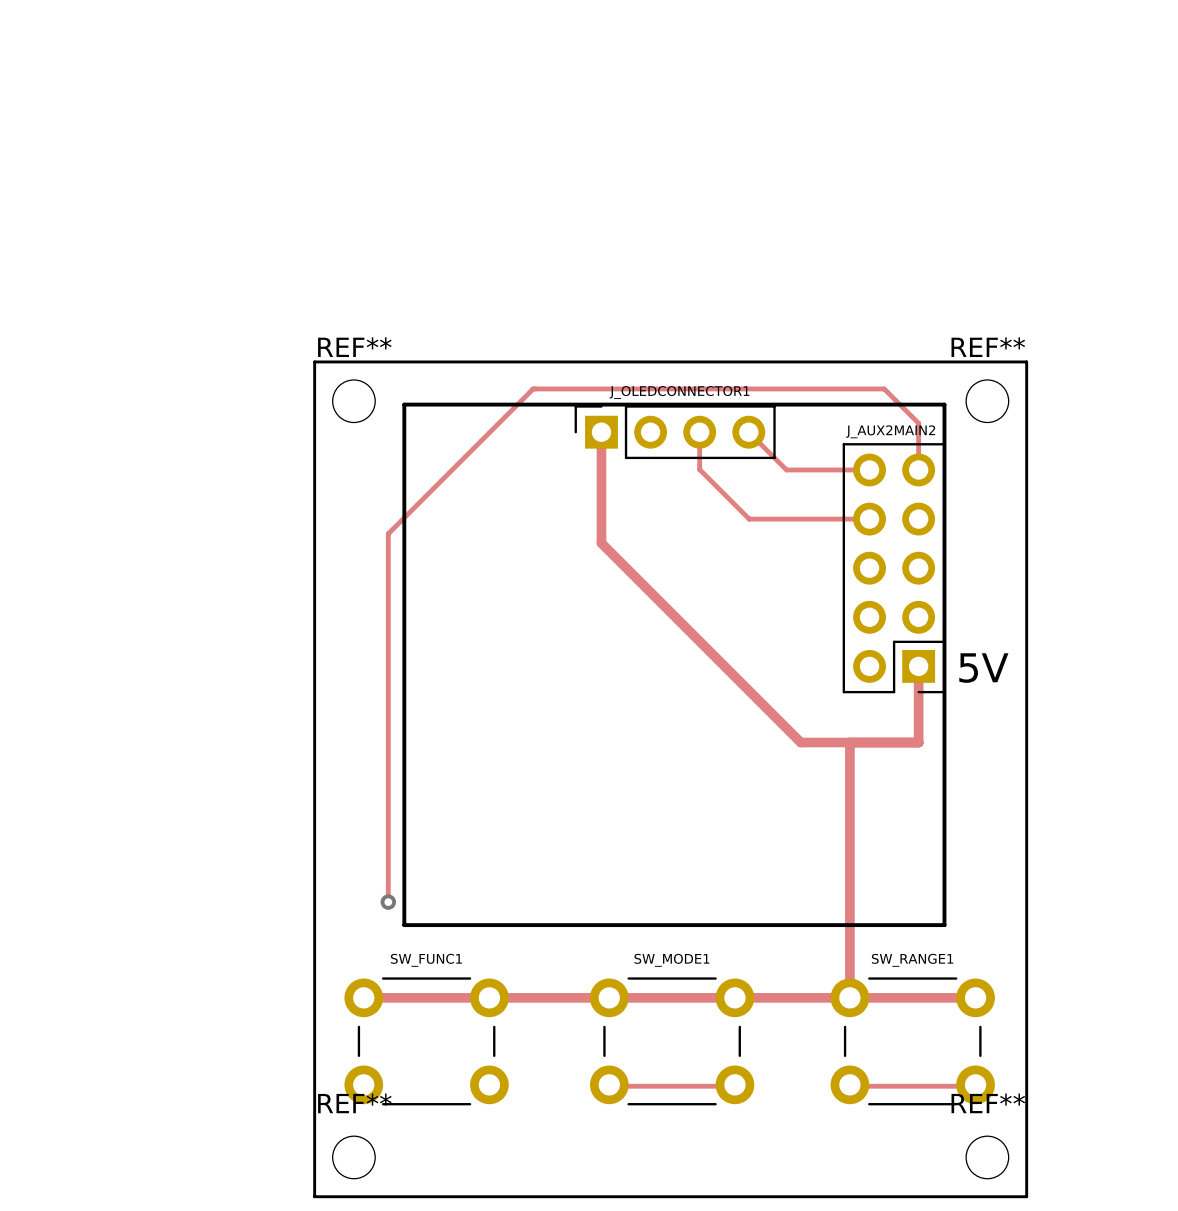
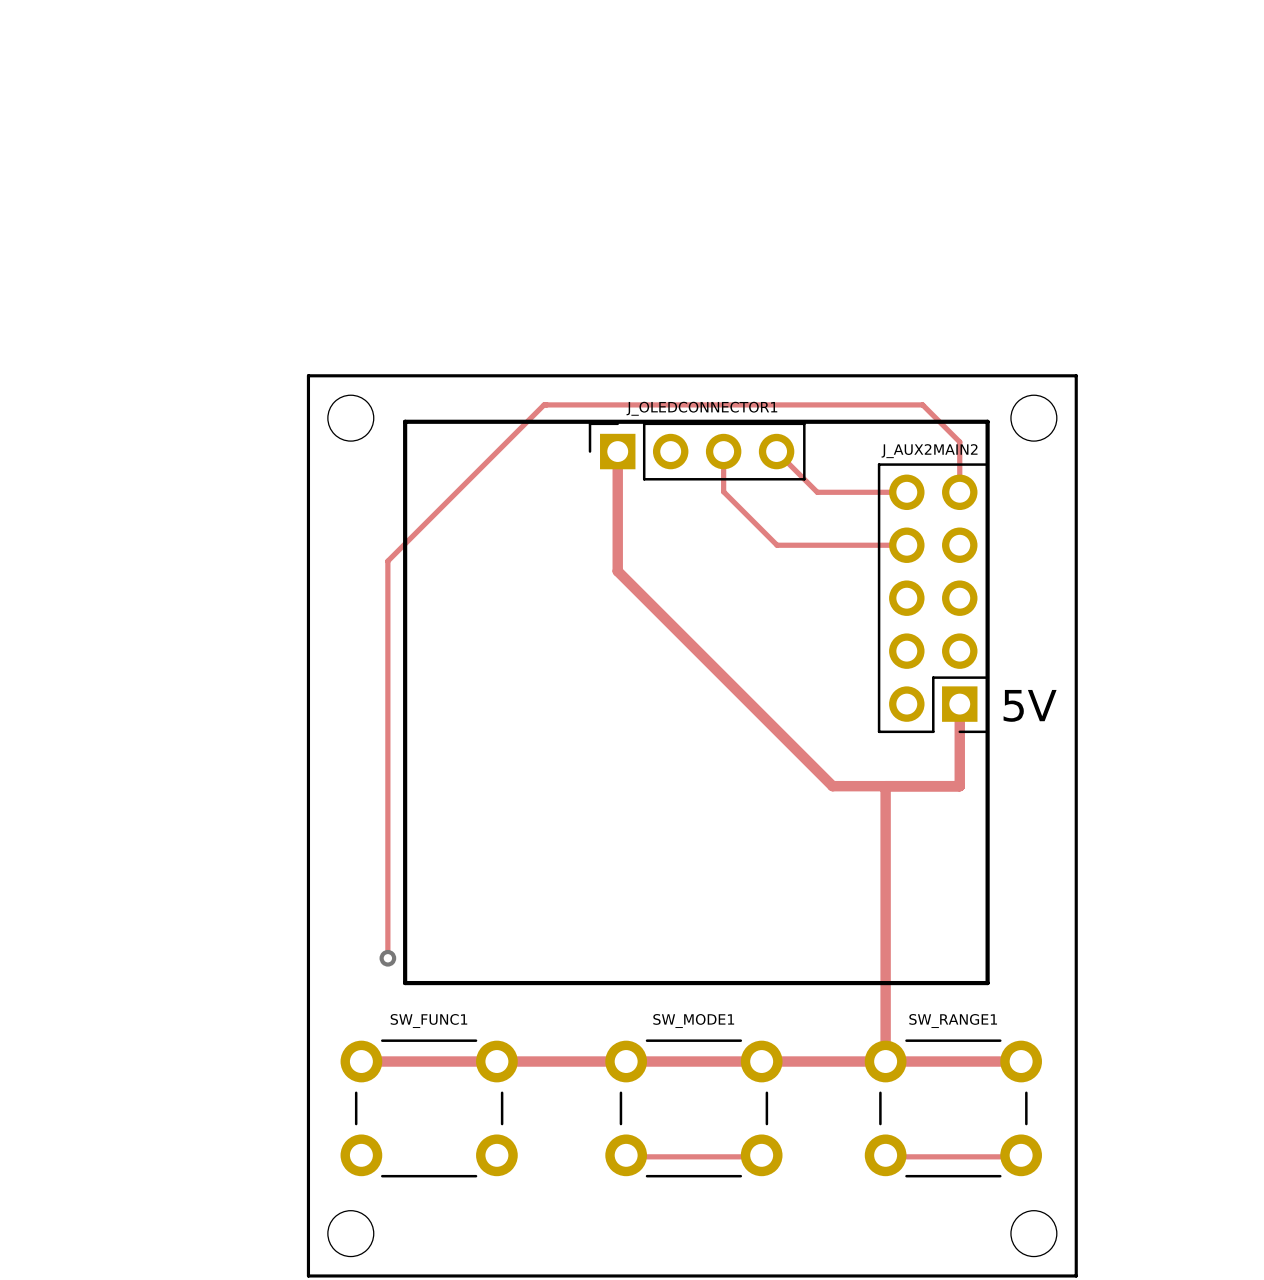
REF** name: REF** (354, 347) -> none
REF** name: REF** (988, 347) -> none
REF** name: REF** (354, 1103) -> none
REF** name: REF** (988, 1103) -> none

